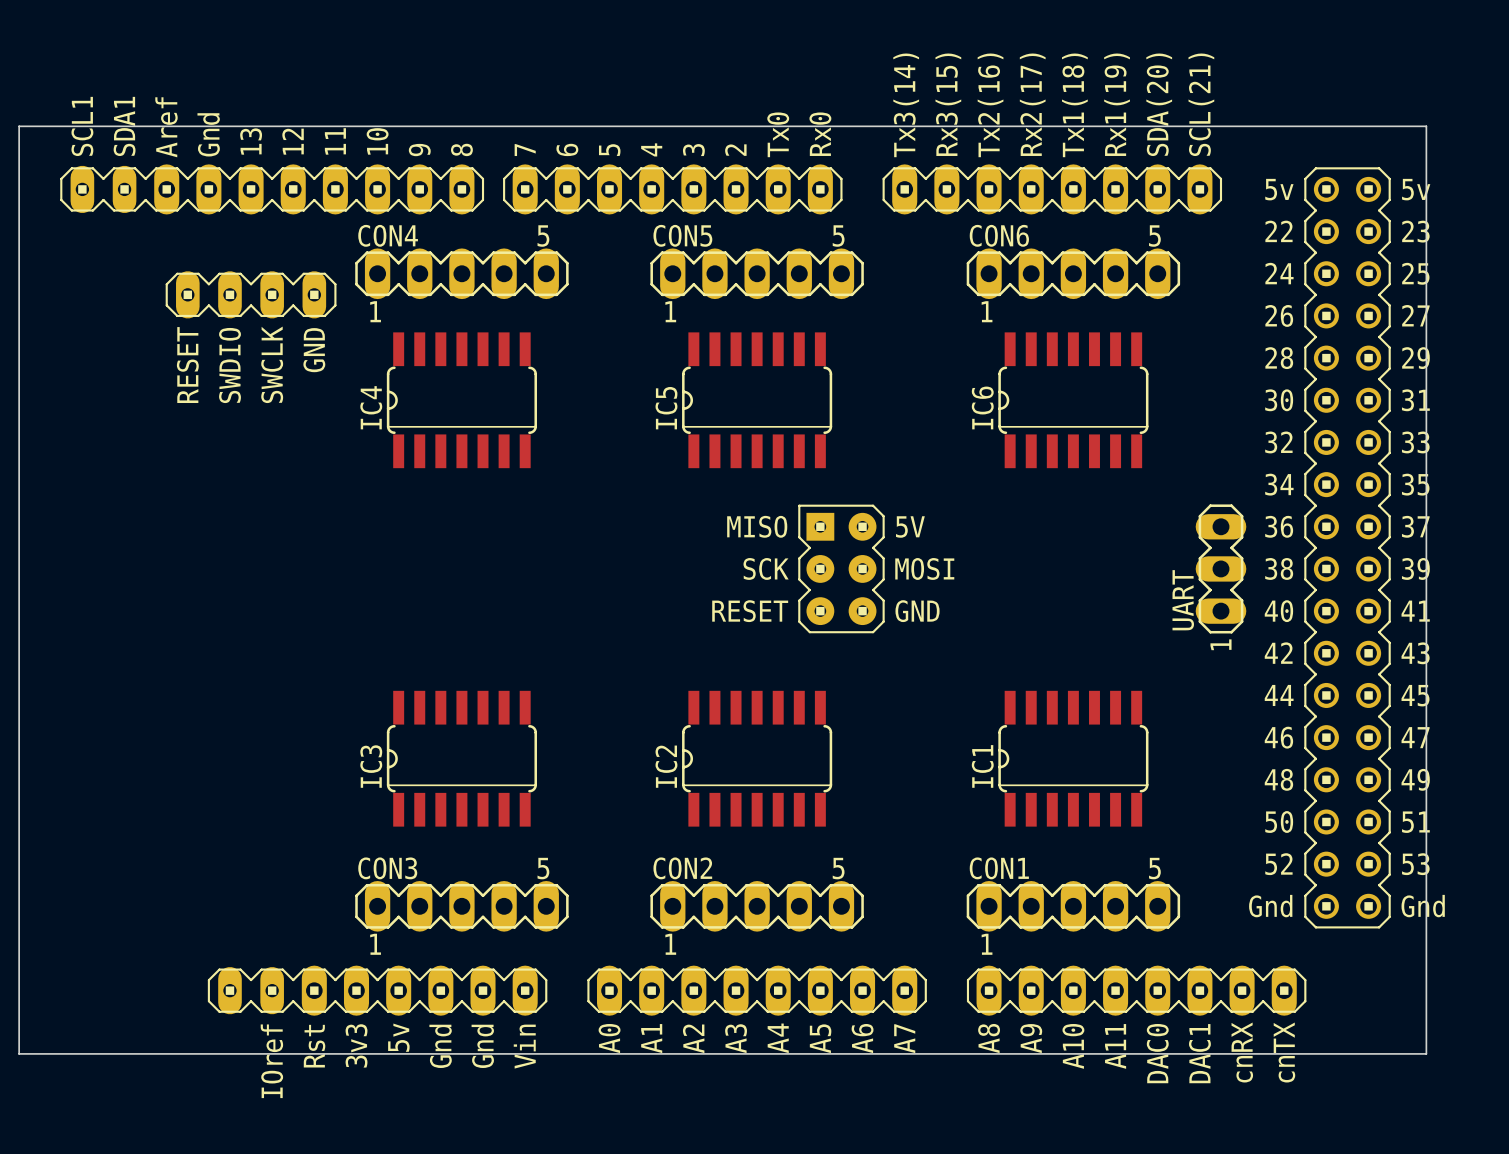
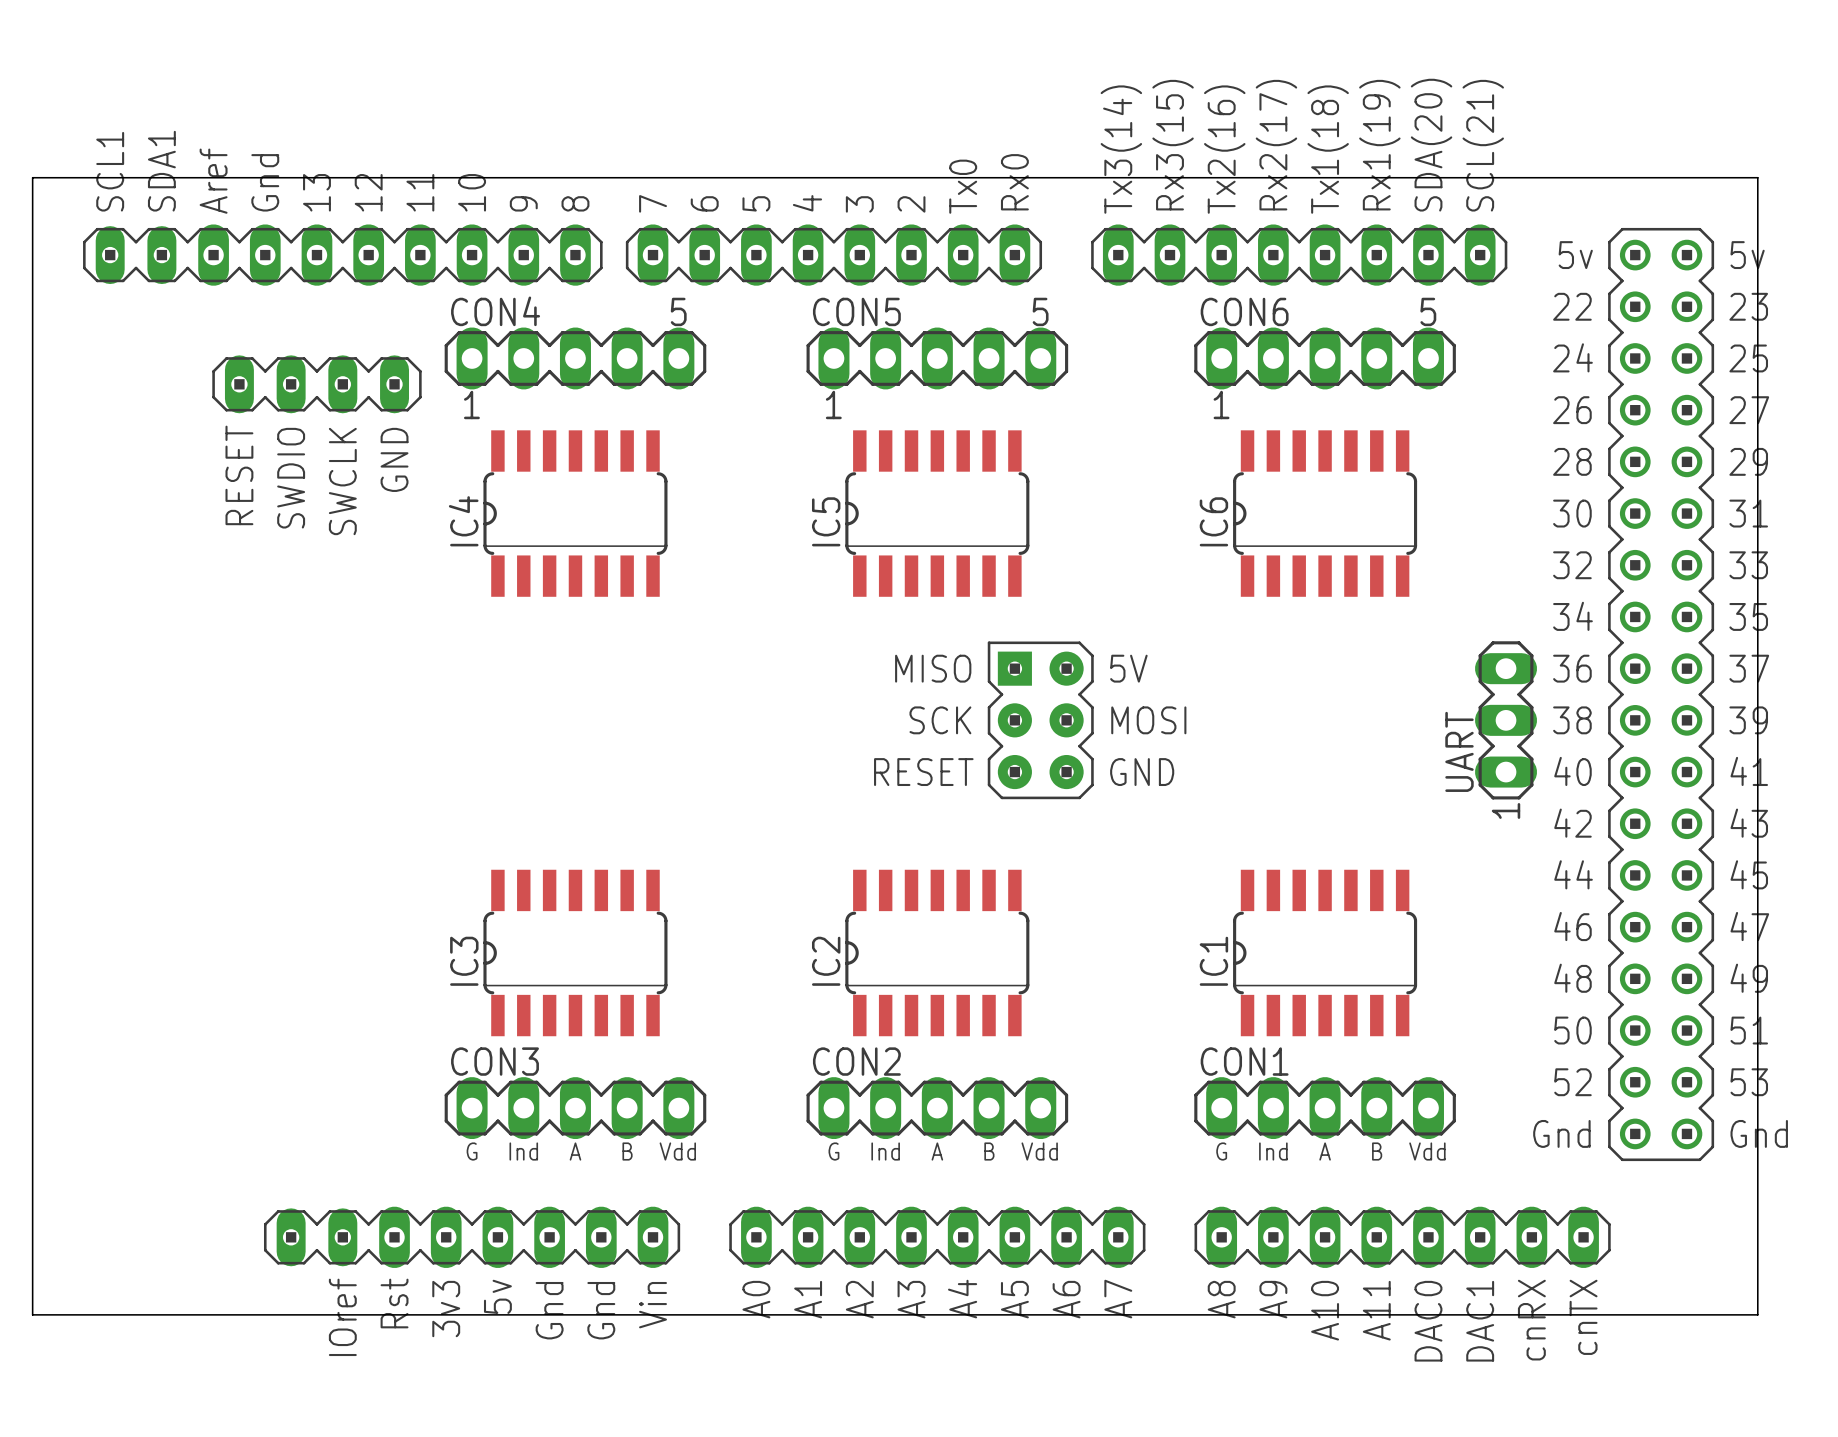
CON3 text: 5 (543, 868) -> none
CON2 text: 5 (838, 868) -> none
CON1 text: 5 (1154, 868) -> none
CON3 position: (461, 906) -> (575, 1108)
CON2 position: (757, 906) -> (937, 1108)
CON1 position: (1073, 906) -> (1325, 1108)
CON3 text: none -> G (472, 1151)
CON3 text: none -> Ind (523, 1151)
CON3 text: none -> A (575, 1151)
CON3 text: none -> B (627, 1151)
CON3 text: none -> Vdd (677, 1151)
CON2 text: none -> G (833, 1151)
CON2 text: none -> Ind (885, 1151)
CON2 text: none -> A (937, 1151)
CON2 text: none -> B (989, 1151)
CON2 text: none -> Vdd (1039, 1151)
CON1 text: none -> G (1221, 1151)
CON1 text: none -> Ind (1273, 1151)
CON1 text: none -> A (1325, 1151)
CON1 text: none -> B (1377, 1151)
CON1 text: none -> Vdd (1427, 1151)
CON3 text: 1 (375, 944) -> none
CON2 text: 1 (670, 944) -> none
CON1 text: 1 (987, 944) -> none

